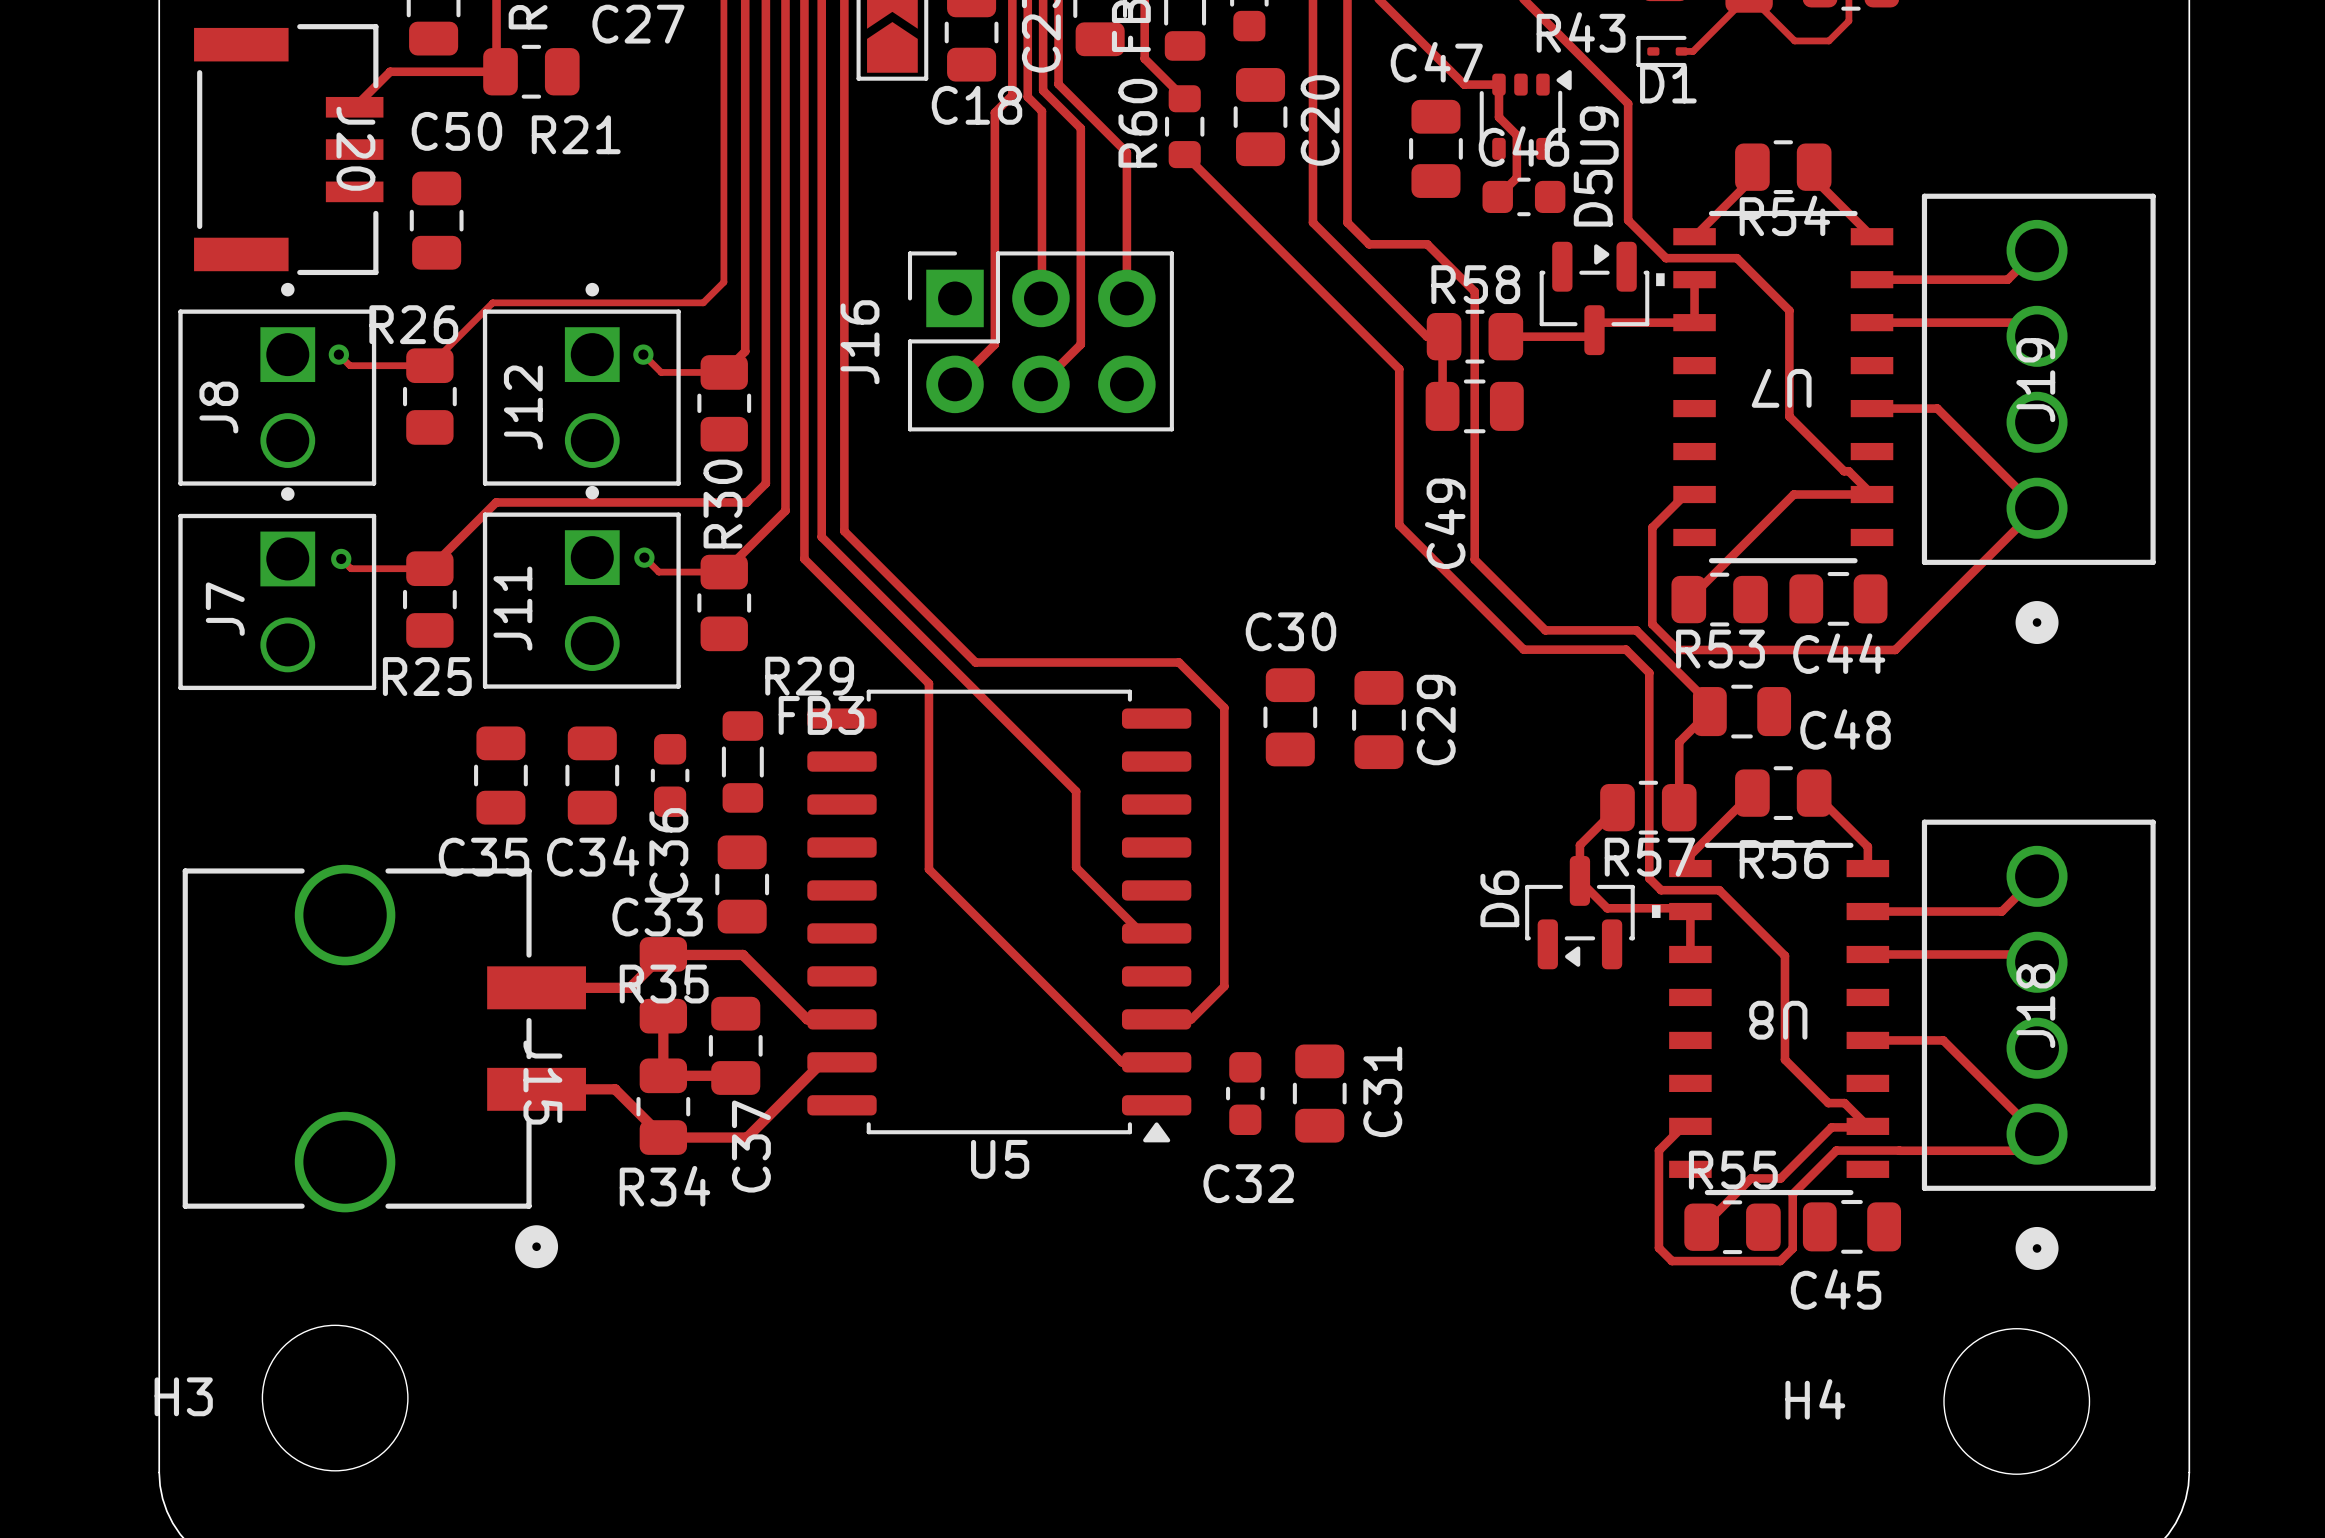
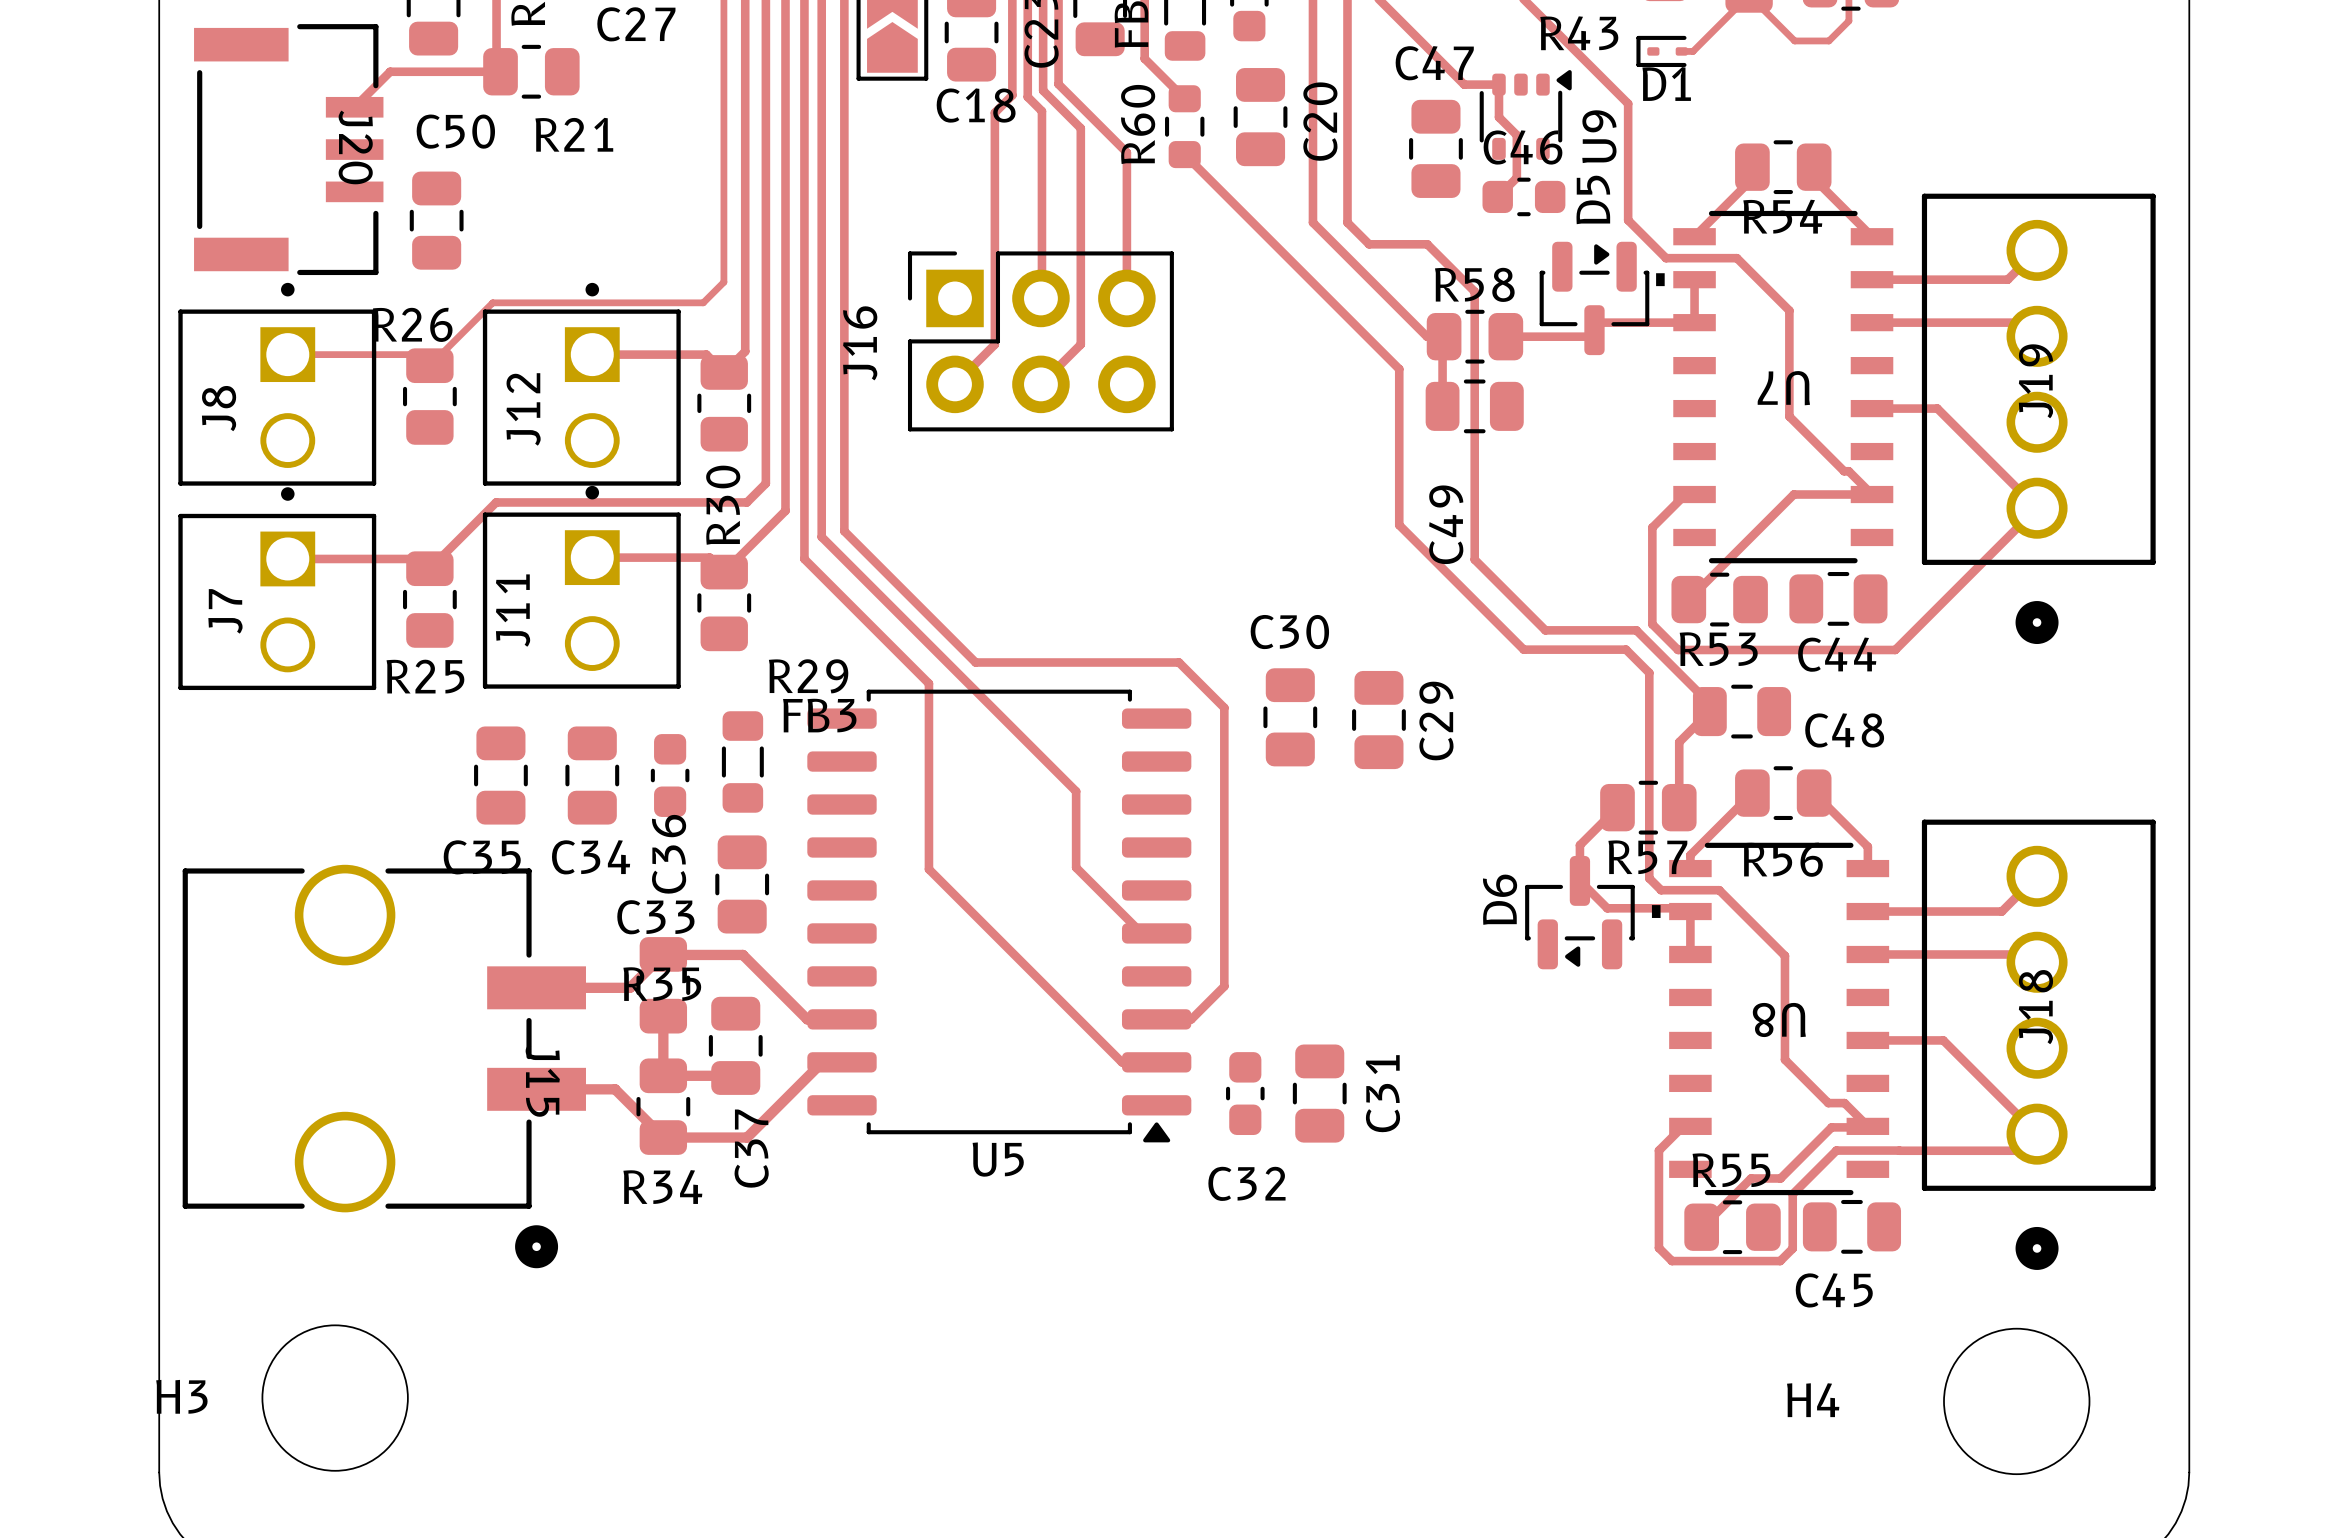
track: none -> (287, 354) (418, 354)
track: (338, 354) (349, 365) (429, 365) -> none
via: (338, 354) -> none
track: (643, 354) (661, 372) (724, 372) -> (592, 354) (706, 354) (724, 372)
via: (643, 354) -> none
track: (644, 557) (658, 572) (724, 572) -> (592, 557) (709, 557) (724, 572)
via: (644, 557) -> none
track: none -> (287, 558) (420, 558)
track: (341, 558) (350, 568) (429, 568) -> none
via: (341, 558) -> none

